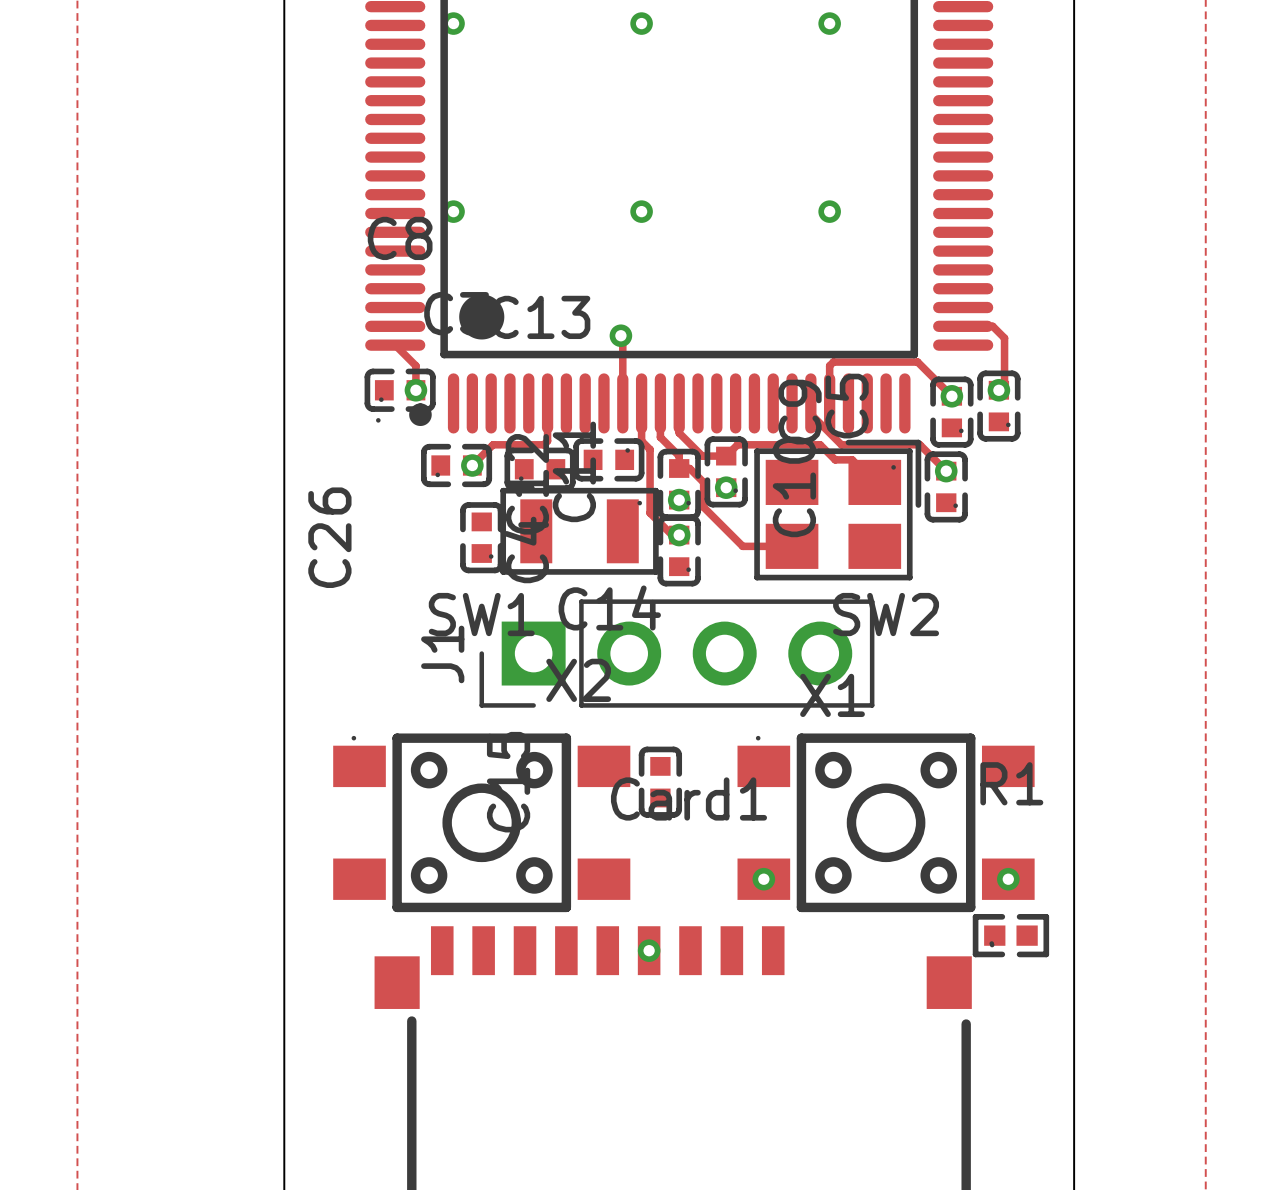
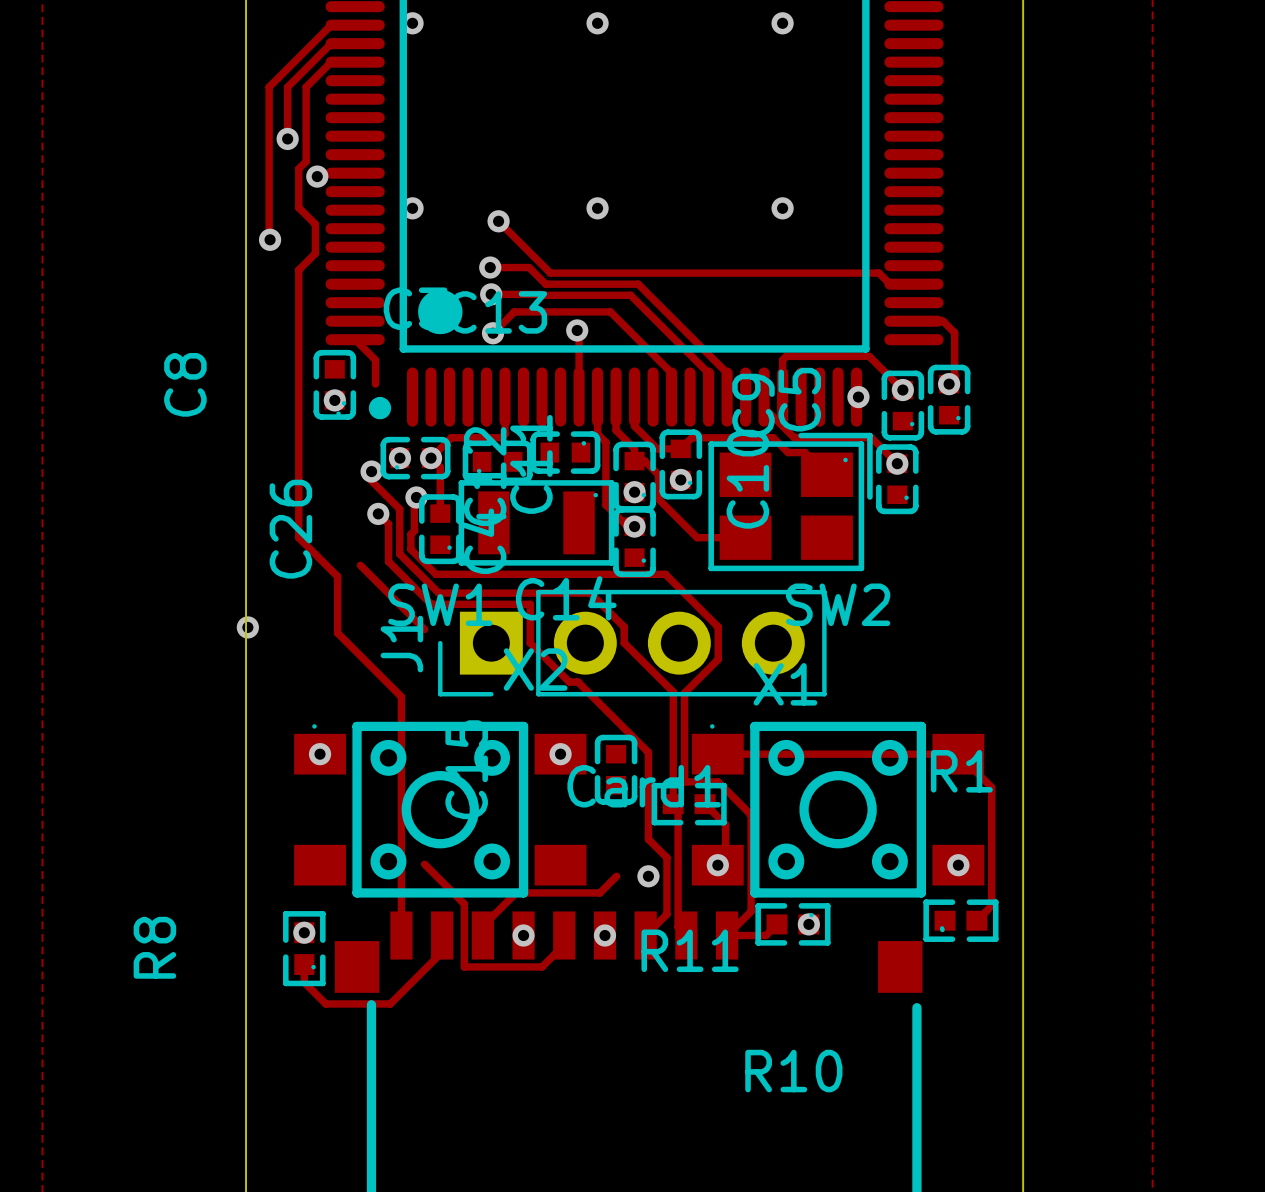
track: none -> (331, 25) (269, 87) (270, 239)
track: none -> (331, 43) (287, 87) (287, 138)
track: none -> (331, 62) (306, 87) (306, 161) (298, 168) (298, 207) (315, 224) (315, 253) (298, 270) (298, 537) (337, 576) (337, 633) (401, 696) (401, 935)
via: none -> (287, 138)
via: none -> (317, 176)
track: none -> (498, 221) (550, 273) (879, 273) (890, 284)
via: none -> (498, 221)
via: none -> (270, 239)
track: none -> (490, 267) (529, 267) (545, 284) (638, 284) (727, 373)
via: none -> (490, 267)
track: none -> (491, 294) (630, 295) (708, 373)
via: none -> (491, 294)
track: none -> (493, 333) (514, 311) (610, 311) (671, 373)
via: none -> (493, 333)
C8 rotation: 0° (400, 390) -> 90° counterclockwise (334, 384)
via: (415, 390) -> none
via: none -> (858, 397)
via: none -> (334, 400)
via: none -> (399, 458)
track: none -> (431, 458) (440, 467) (440, 513)
track: none -> (371, 471) (371, 481) (399, 509) (399, 554) (438, 593) (590, 593) (624, 627) (624, 642) (673, 692) (673, 804)
via: none -> (371, 471)
track: none -> (416, 497) (414, 499) (414, 530) (410, 534) (410, 549) (435, 574) (665, 574) (718, 627) (718, 659) (684, 693) (684, 781) (718, 781) (751, 814) (751, 911) (727, 935) (765, 935) (777, 924)
via: none -> (416, 497)
track: none -> (378, 513) (388, 524) (388, 561) (431, 604) (530, 604) (530, 642) (569, 682) (577, 682) (648, 752) (648, 839) (666, 857) (666, 914) (645, 935)
via: none -> (378, 513)
track: none -> (360, 565) (424, 629)
via: none -> (247, 627)
via: none -> (320, 754)
via: none -> (560, 754)
track: none -> (717, 754) (958, 754) (991, 787) (991, 905) (976, 920)
R11: none -> (689, 804)
track: none -> (705, 804) (725, 824) (725, 857)
track: none -> (678, 808) (678, 927) (686, 935)
track: none -> (424, 864) (464, 904) (464, 966) (542, 966) (564, 944)
track: none -> (616, 876) (599, 892) (516, 892) (482, 926)
via: none -> (648, 876)
R10: none -> (792, 924)
via: none -> (808, 924)
via: none -> (304, 932)
via: none -> (523, 935)
R8: none -> (304, 948)
track: none -> (442, 952) (390, 1003) (325, 1003) (304, 982) (304, 964)

